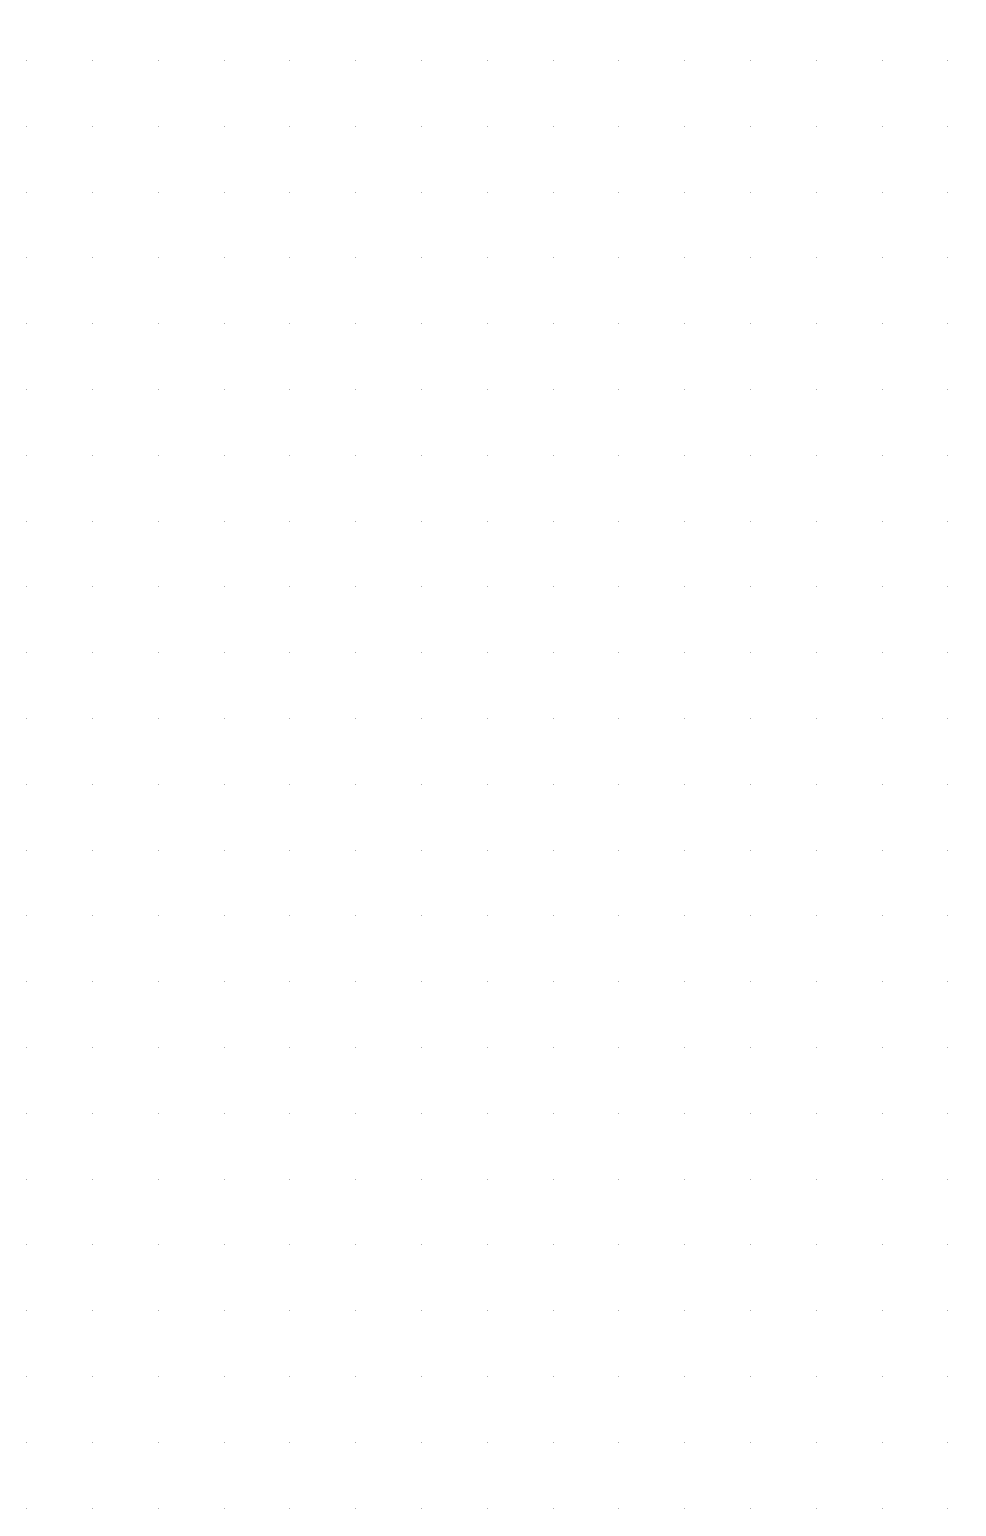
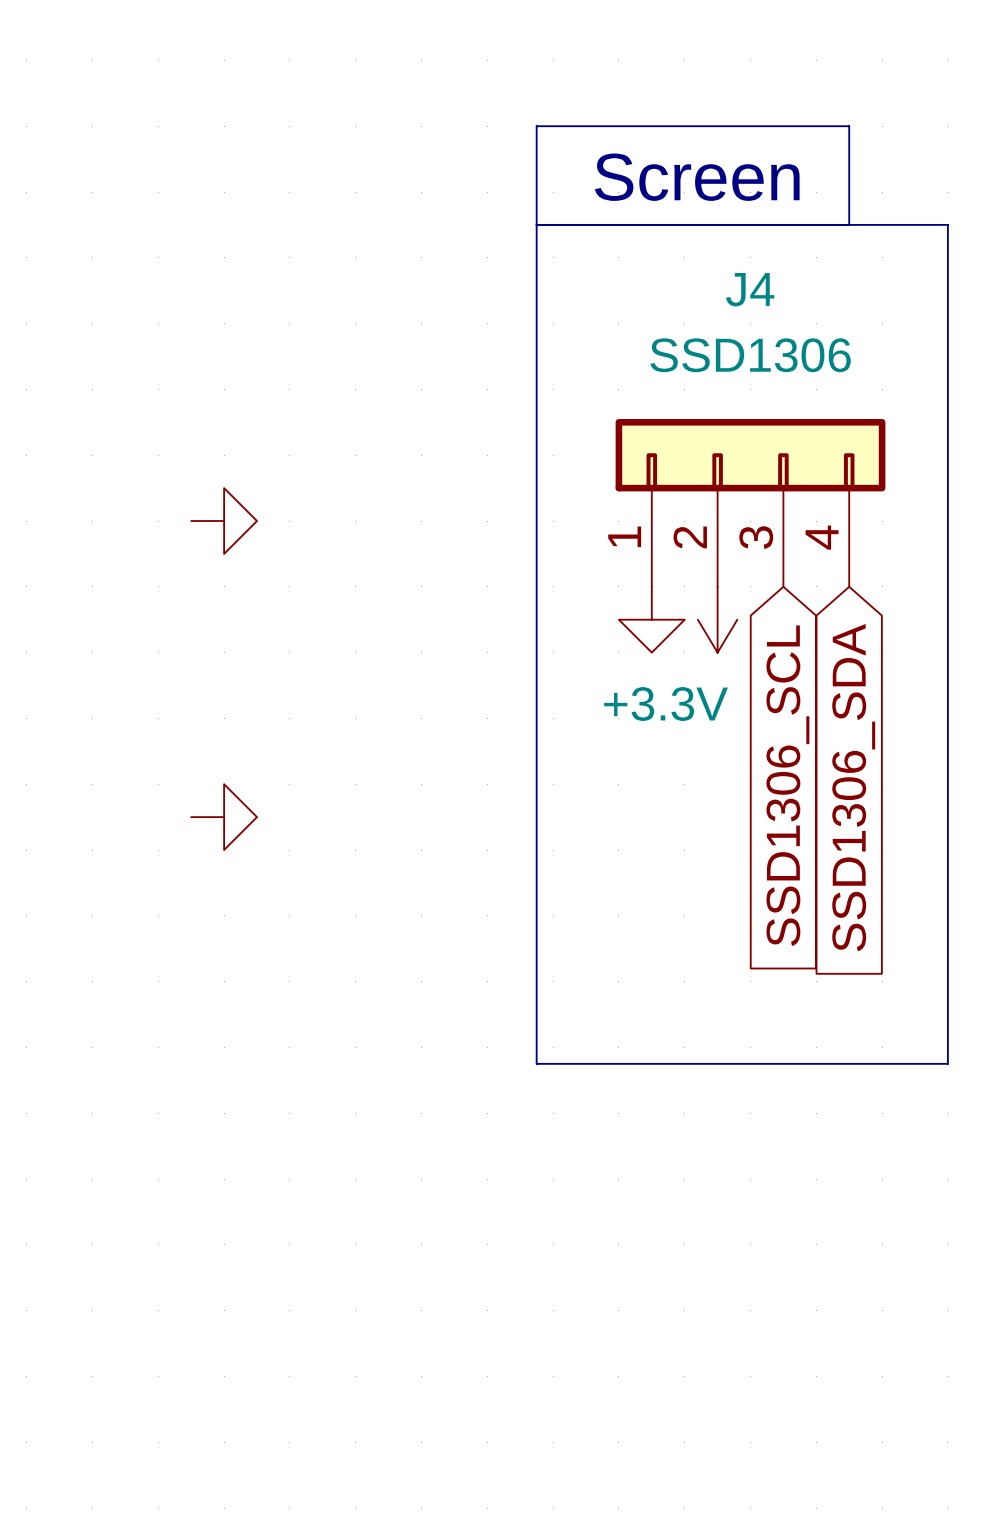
text: none -> Screen (697, 177)
line: none -> (536, 224) (947, 224) (947, 1063) (536, 1063) (536, 126) (849, 126) (849, 224)
J4: none -> SSD1306 (750, 502)
power symbol: none -> (224, 521)
power symbol: none -> (651, 619)
power symbol: none -> +3.3V (717, 619)
global label: none -> SSD1306_SCL (787, 785)
global label: none -> SSD1306_SDA (853, 787)
power symbol: none -> (224, 817)

